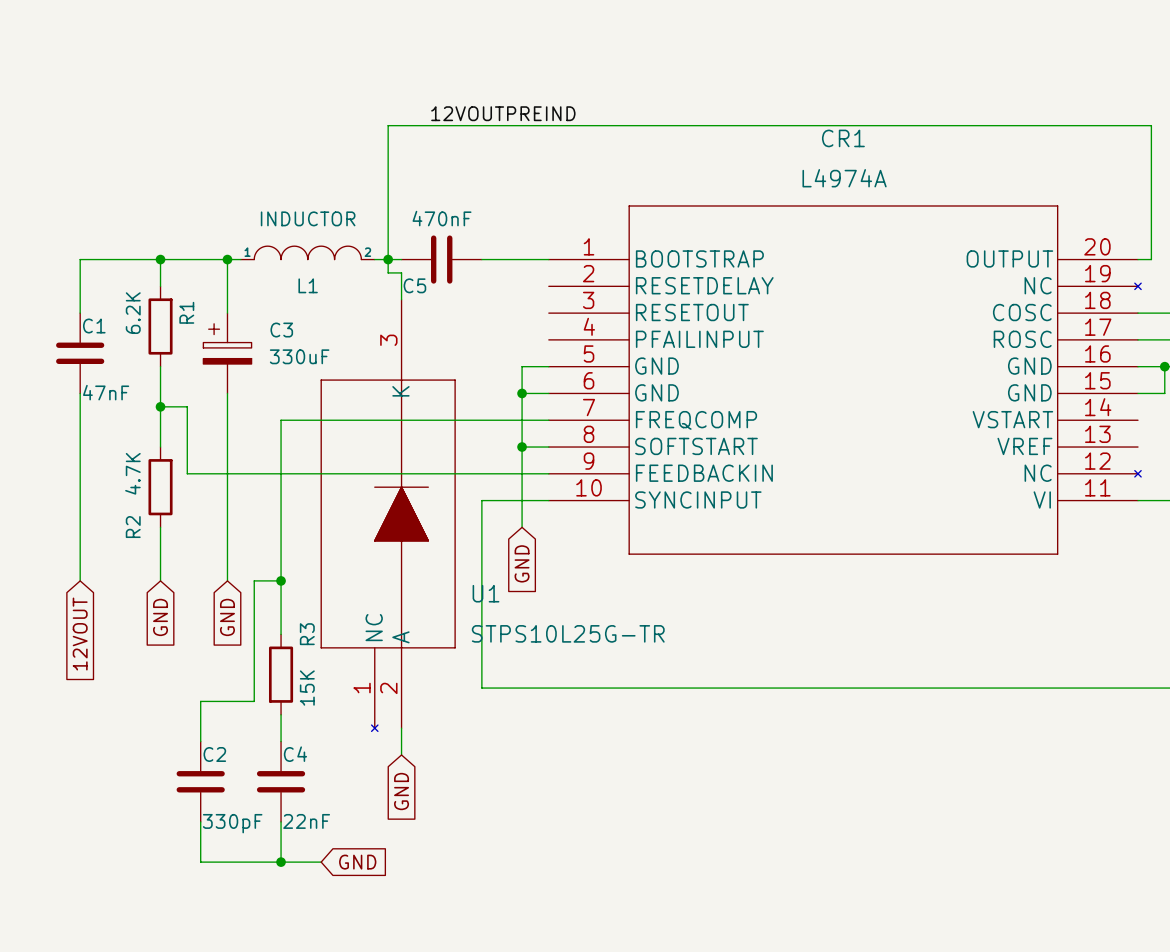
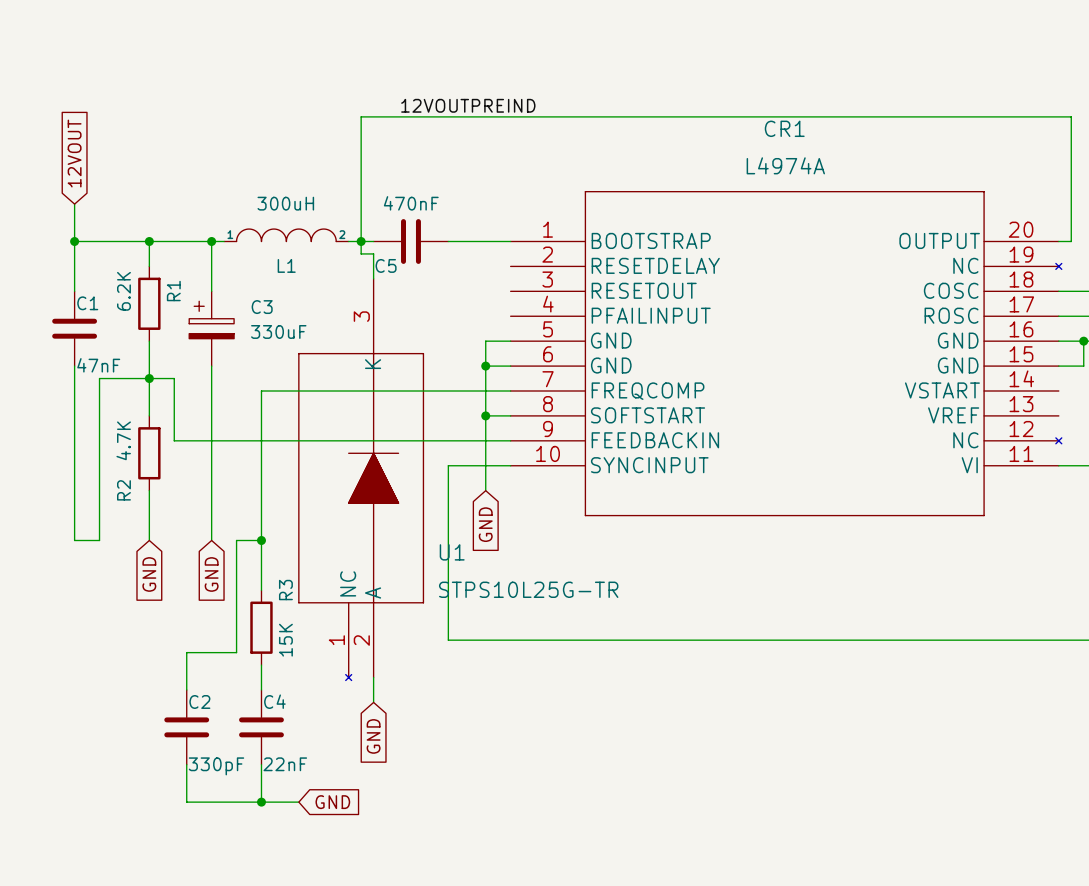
global label: none -> 12VOUT (74, 153)
L1 value: INDUCTOR (308, 218) -> 300uH (285, 203)
wire: none -> (74, 204) (74, 241)
junction: none -> (74, 241)
wire: none -> (149, 378) (99, 378) (99, 540) (74, 540)
global label: 12VOUT (80, 634) -> none

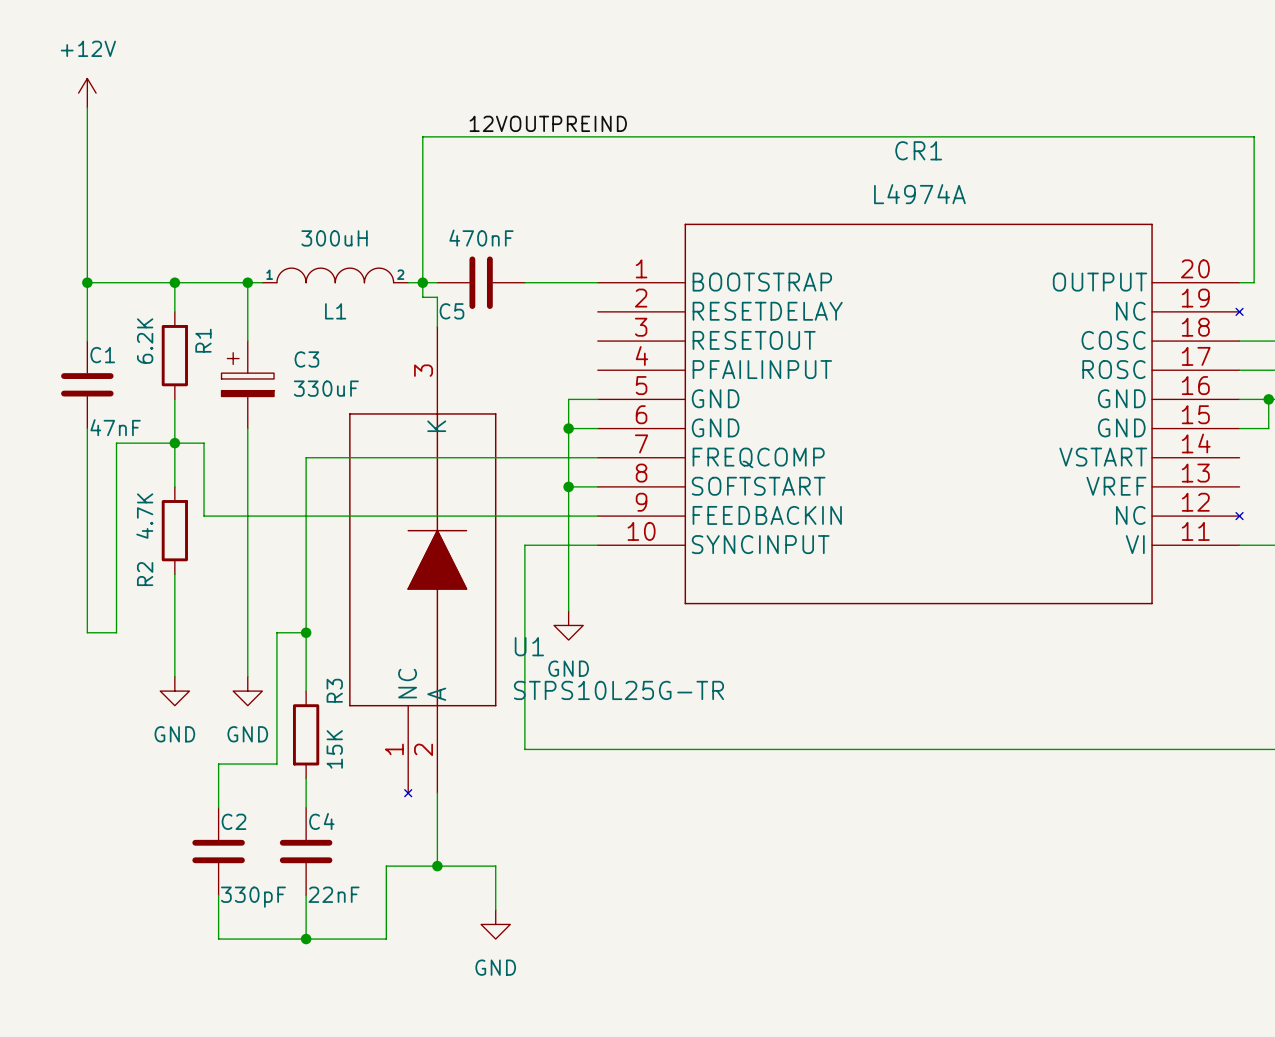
power symbol: none -> +12V (87, 93)
wire: none -> (87, 107) (87, 238)
global label: 12VOUT (74, 153) -> none
wire: none -> (568, 574) (568, 610)
global label: GND (485, 524) -> none
power symbol: none -> GND (568, 625)
wire: none -> (174, 632) (174, 676)
wire: none -> (247, 632) (247, 676)
global label: GND (149, 574) -> none
global label: GND (211, 574) -> none
power symbol: none -> GND (174, 691)
power symbol: none -> GND (247, 691)
wire: none -> (437, 822) (437, 866)
global label: GND (373, 736) -> none
junction: none -> (437, 866)
wire: none -> (495, 909) (495, 866) (386, 866) (386, 939) (349, 939)
power symbol: none -> GND (495, 924)
global label: GND (332, 802) -> none

